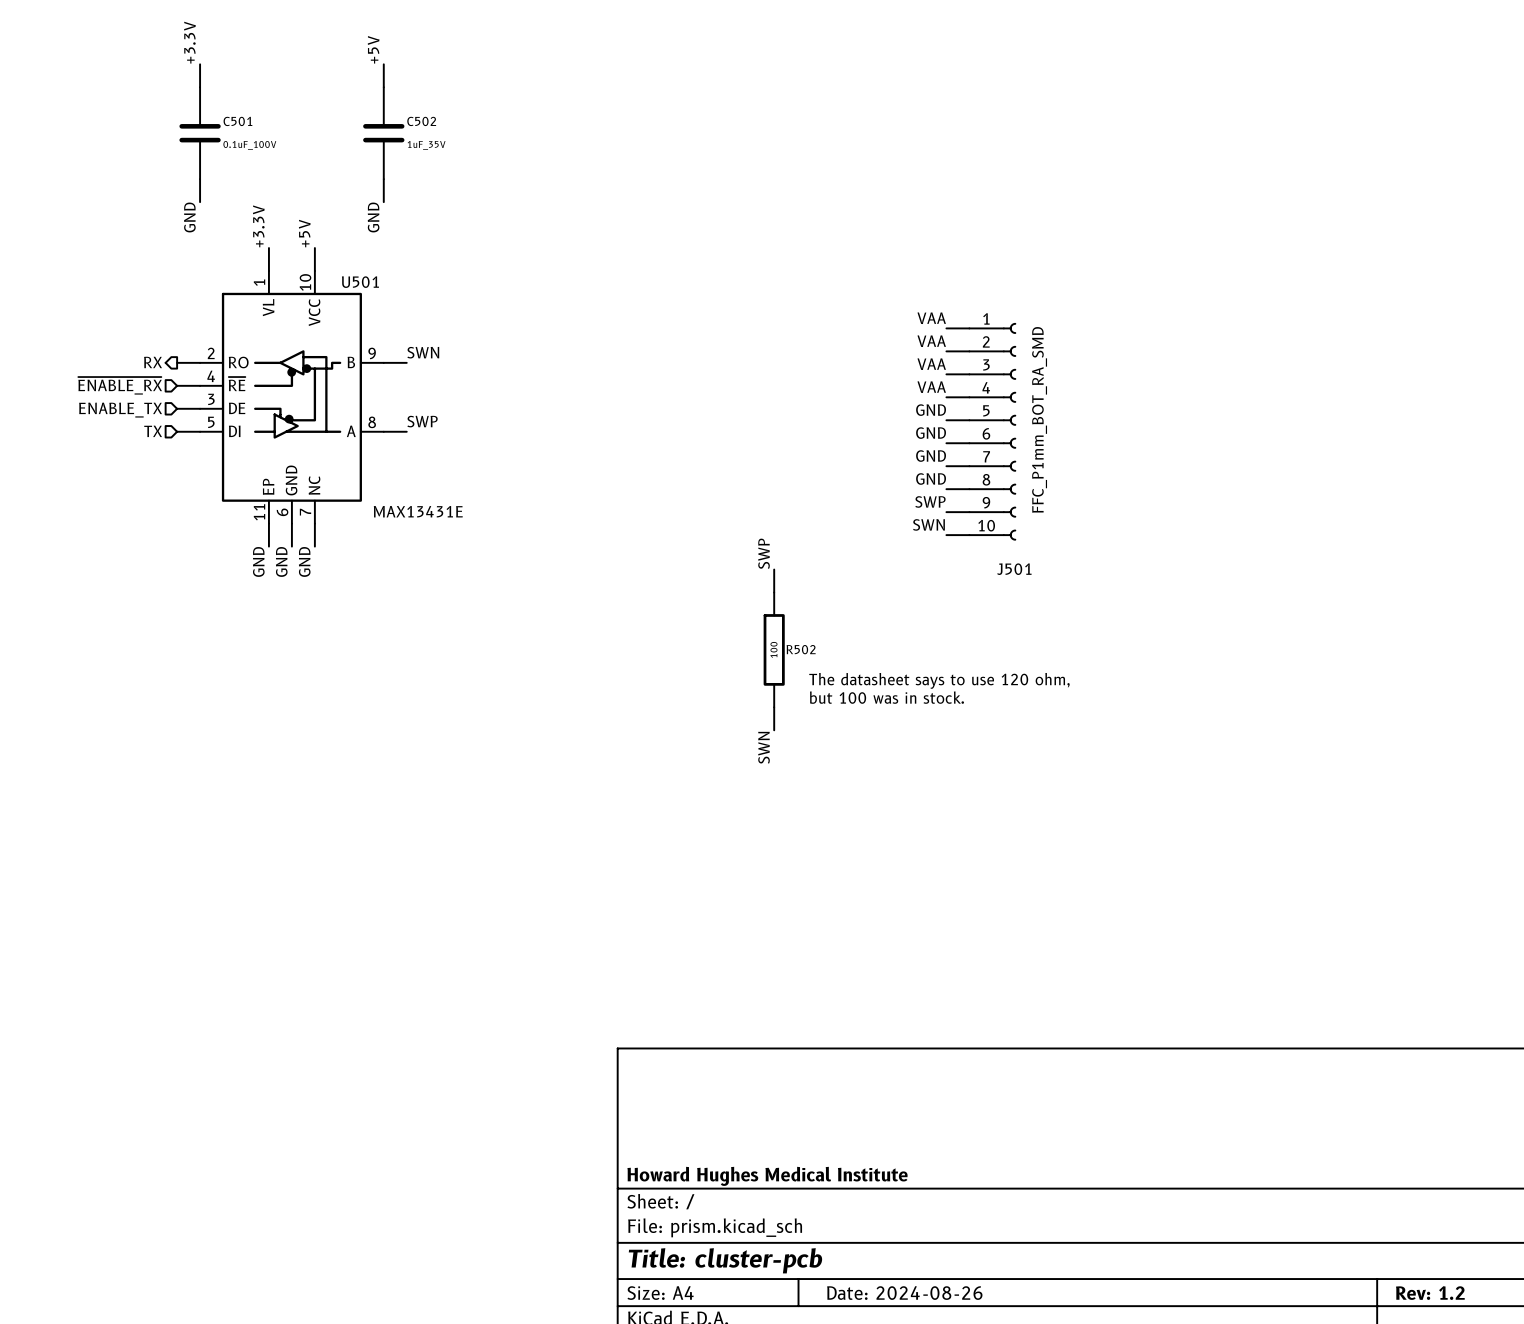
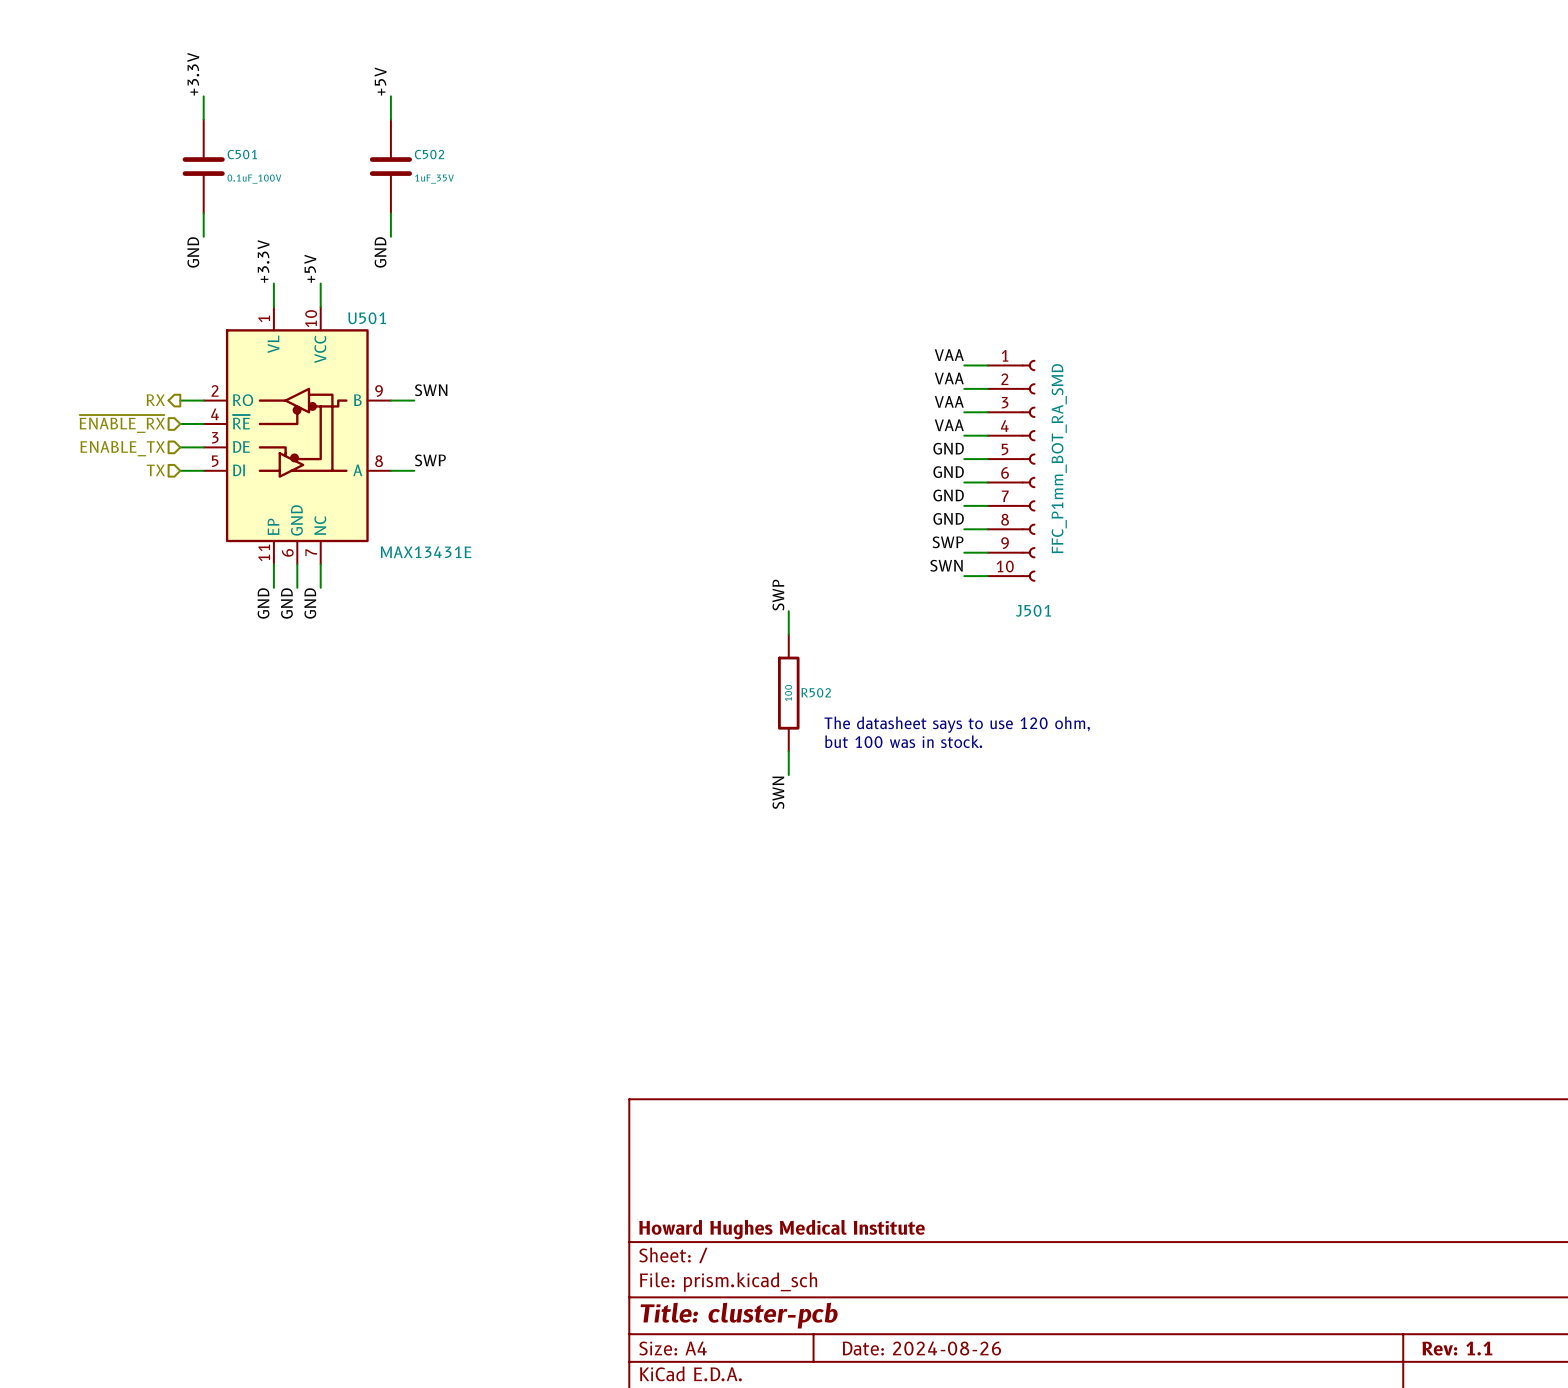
title block: Rev: 1.2 (1430, 1293) -> Rev: 1.1 (1457, 1348)

